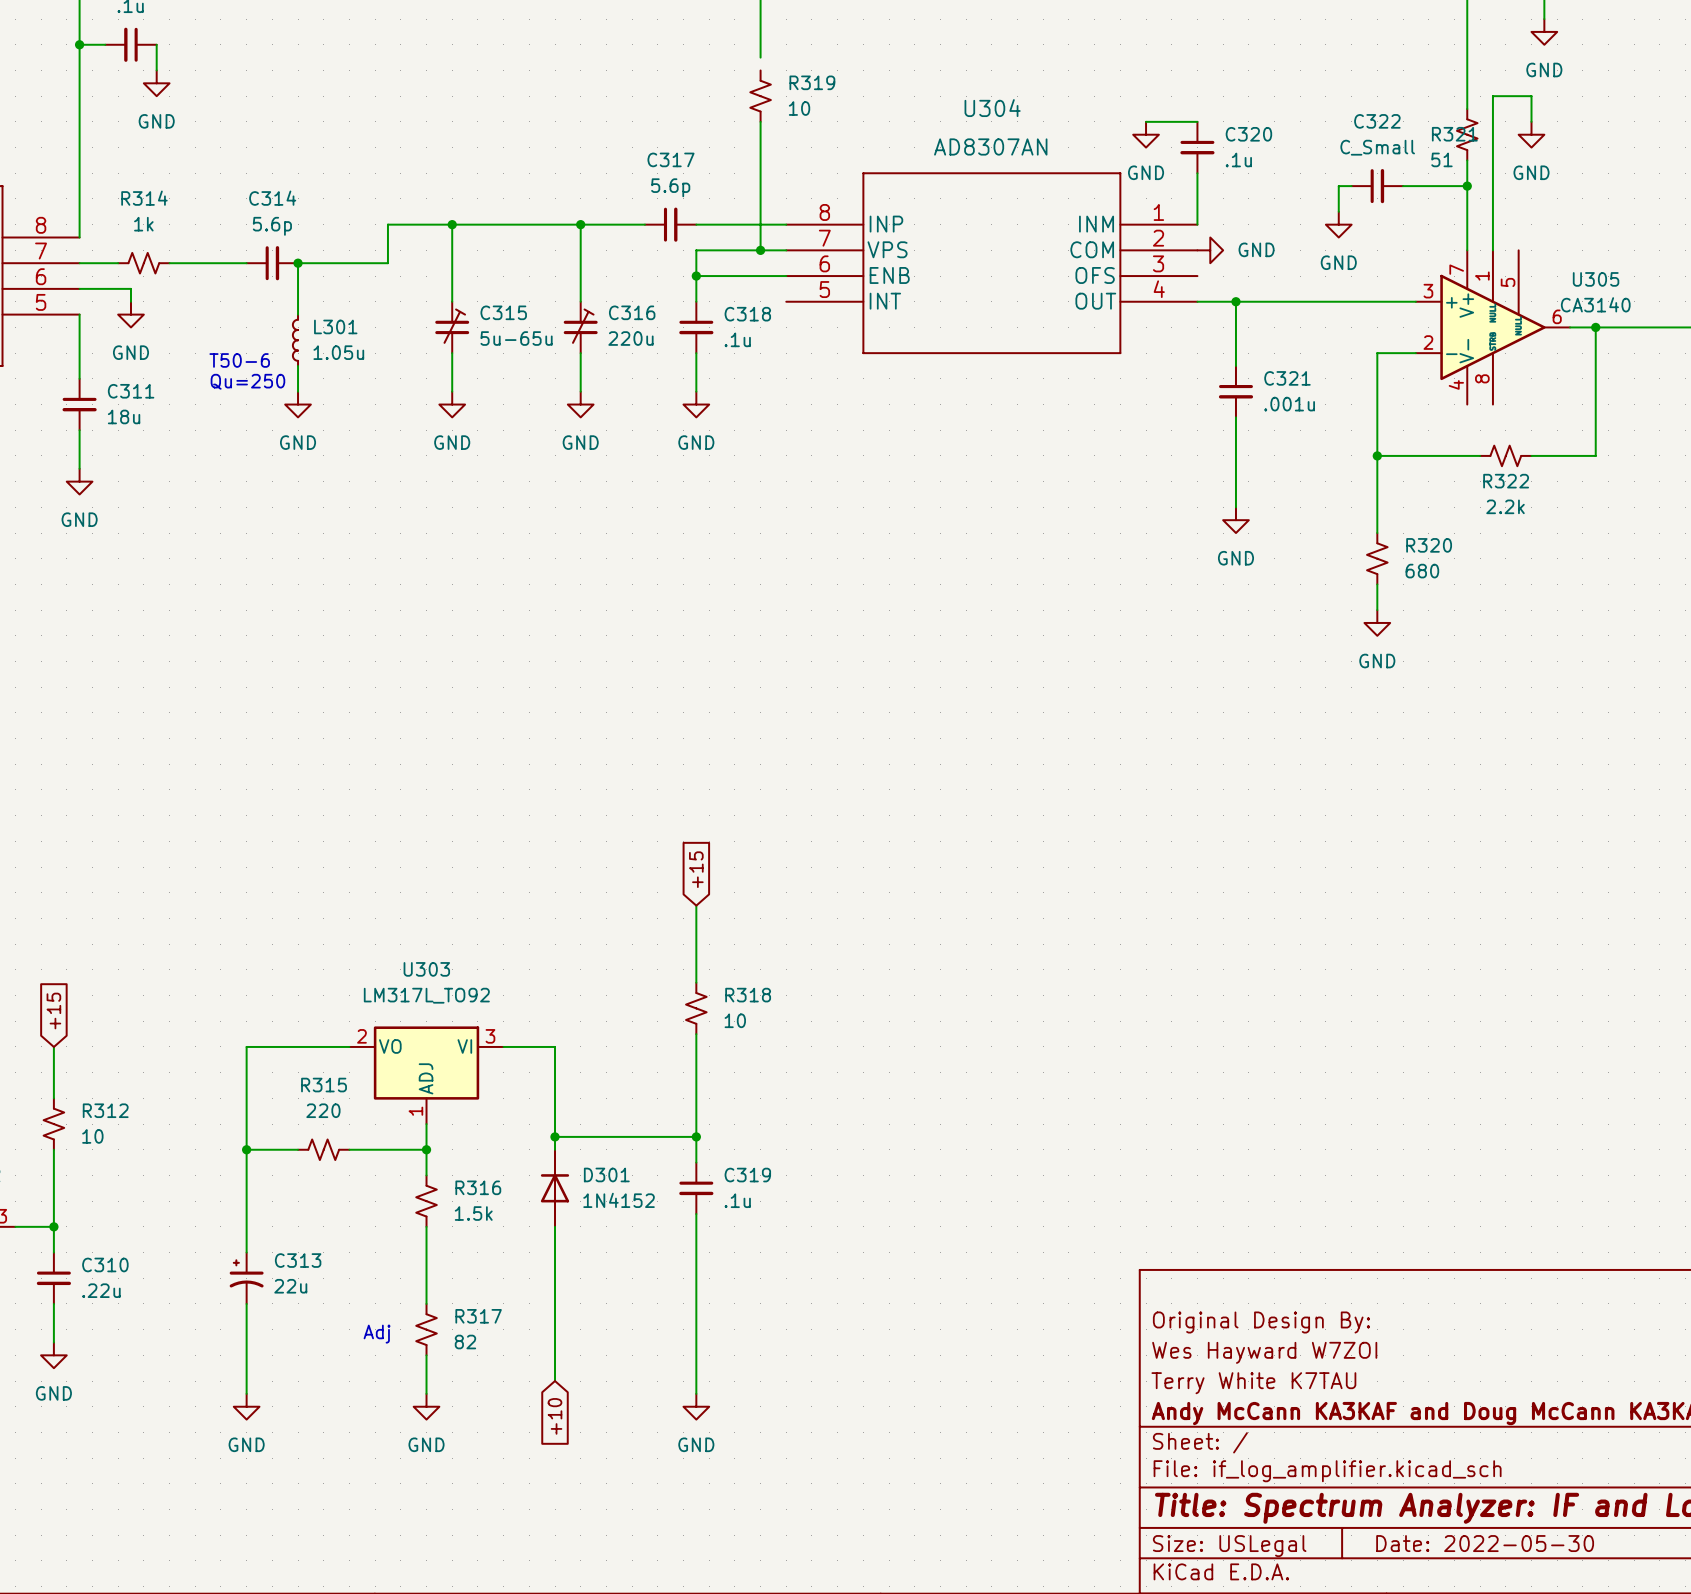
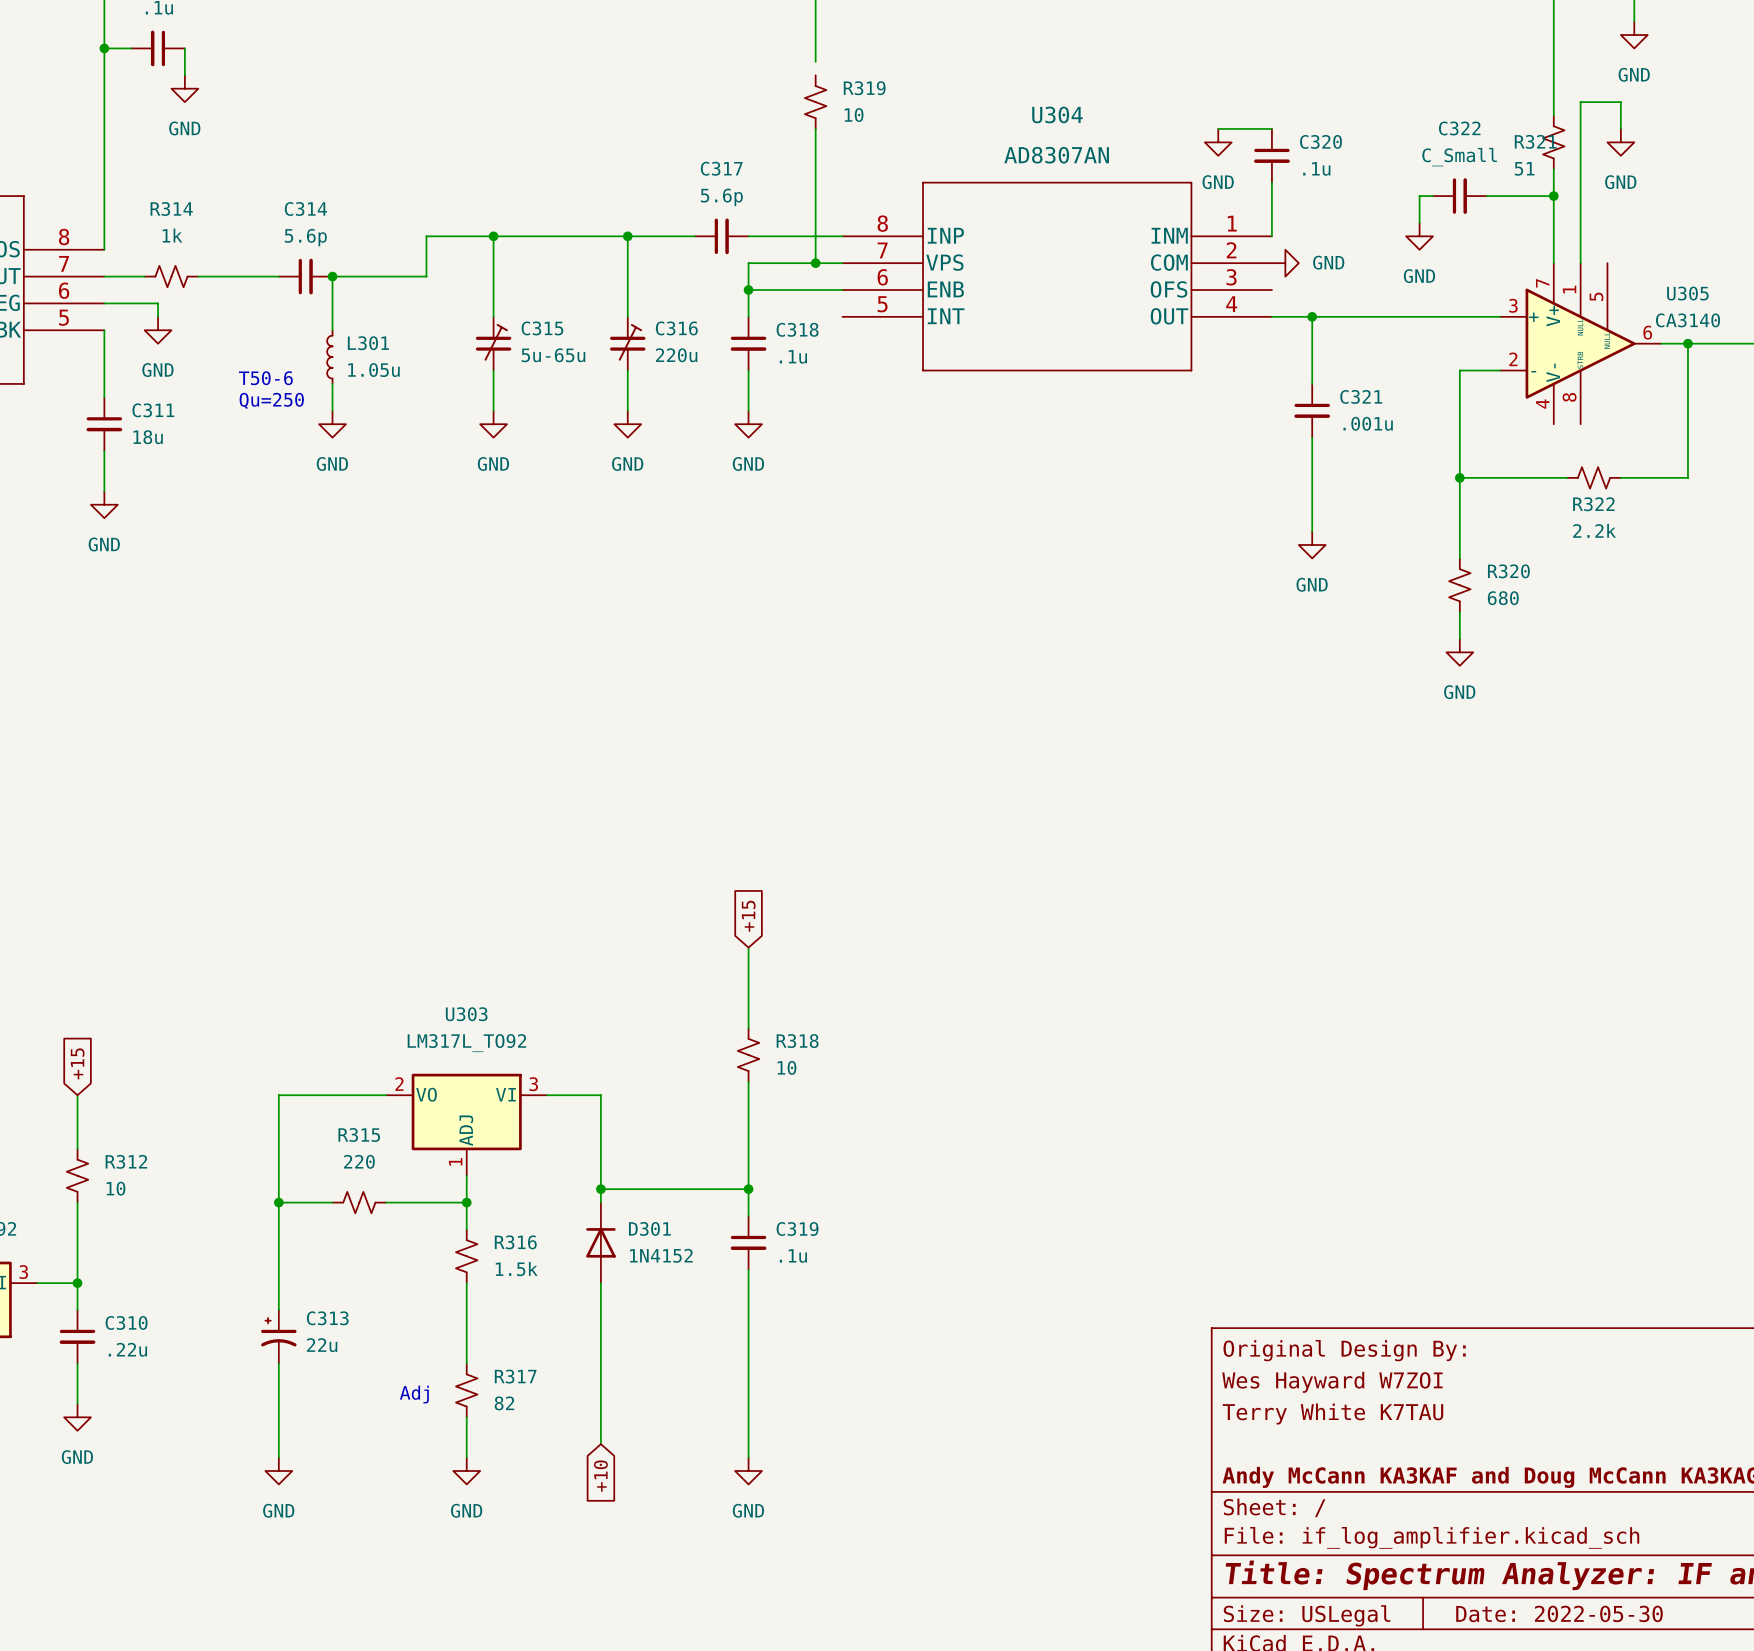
title block: none -> Original Design By: (1344, 1350)
title block: Original Design By: (1261, 1322) -> Wes Hayward W7ZOI (1332, 1382)
title block: Wes Hayward W7ZOI (1264, 1352) -> Terry White K7TAU (1333, 1414)
title block: Terry White K7TAU (1253, 1383) -> none

